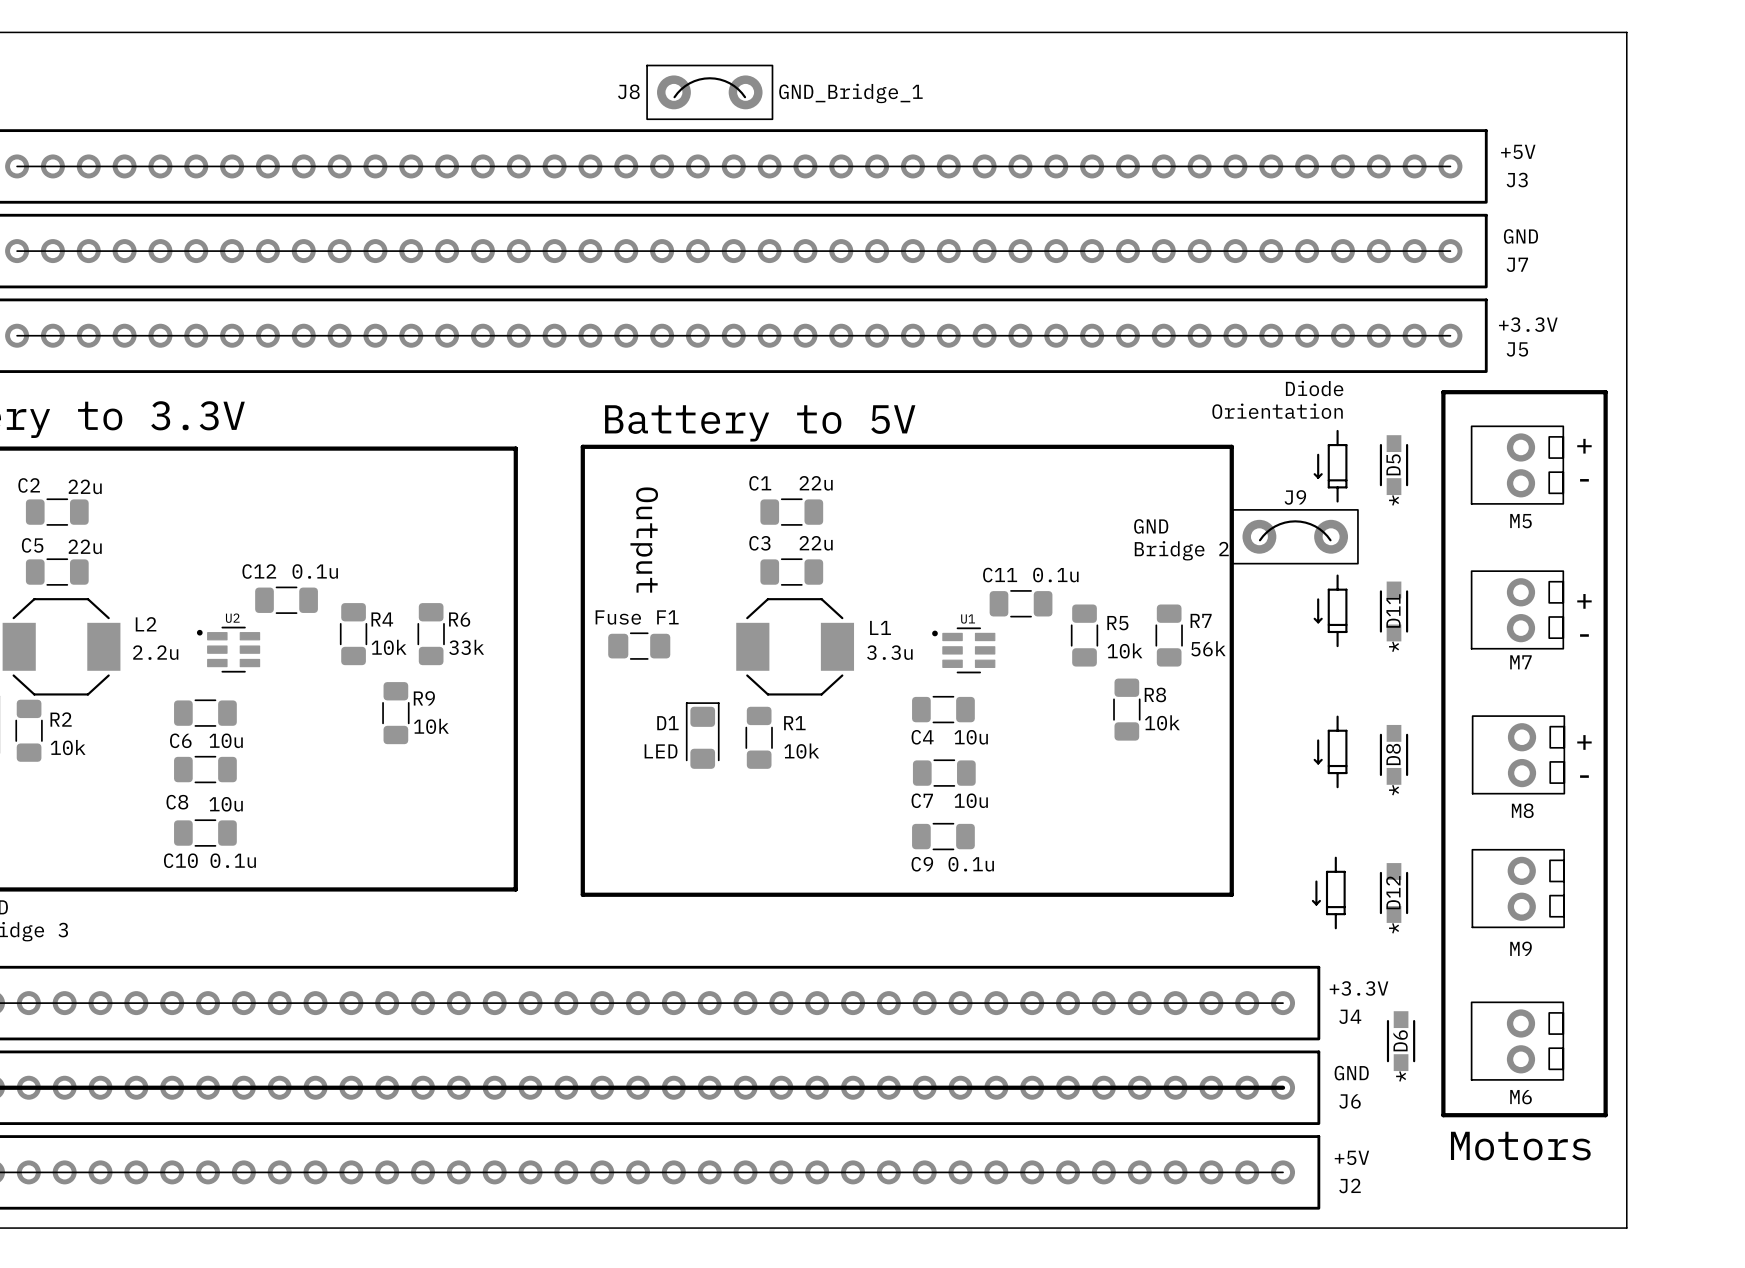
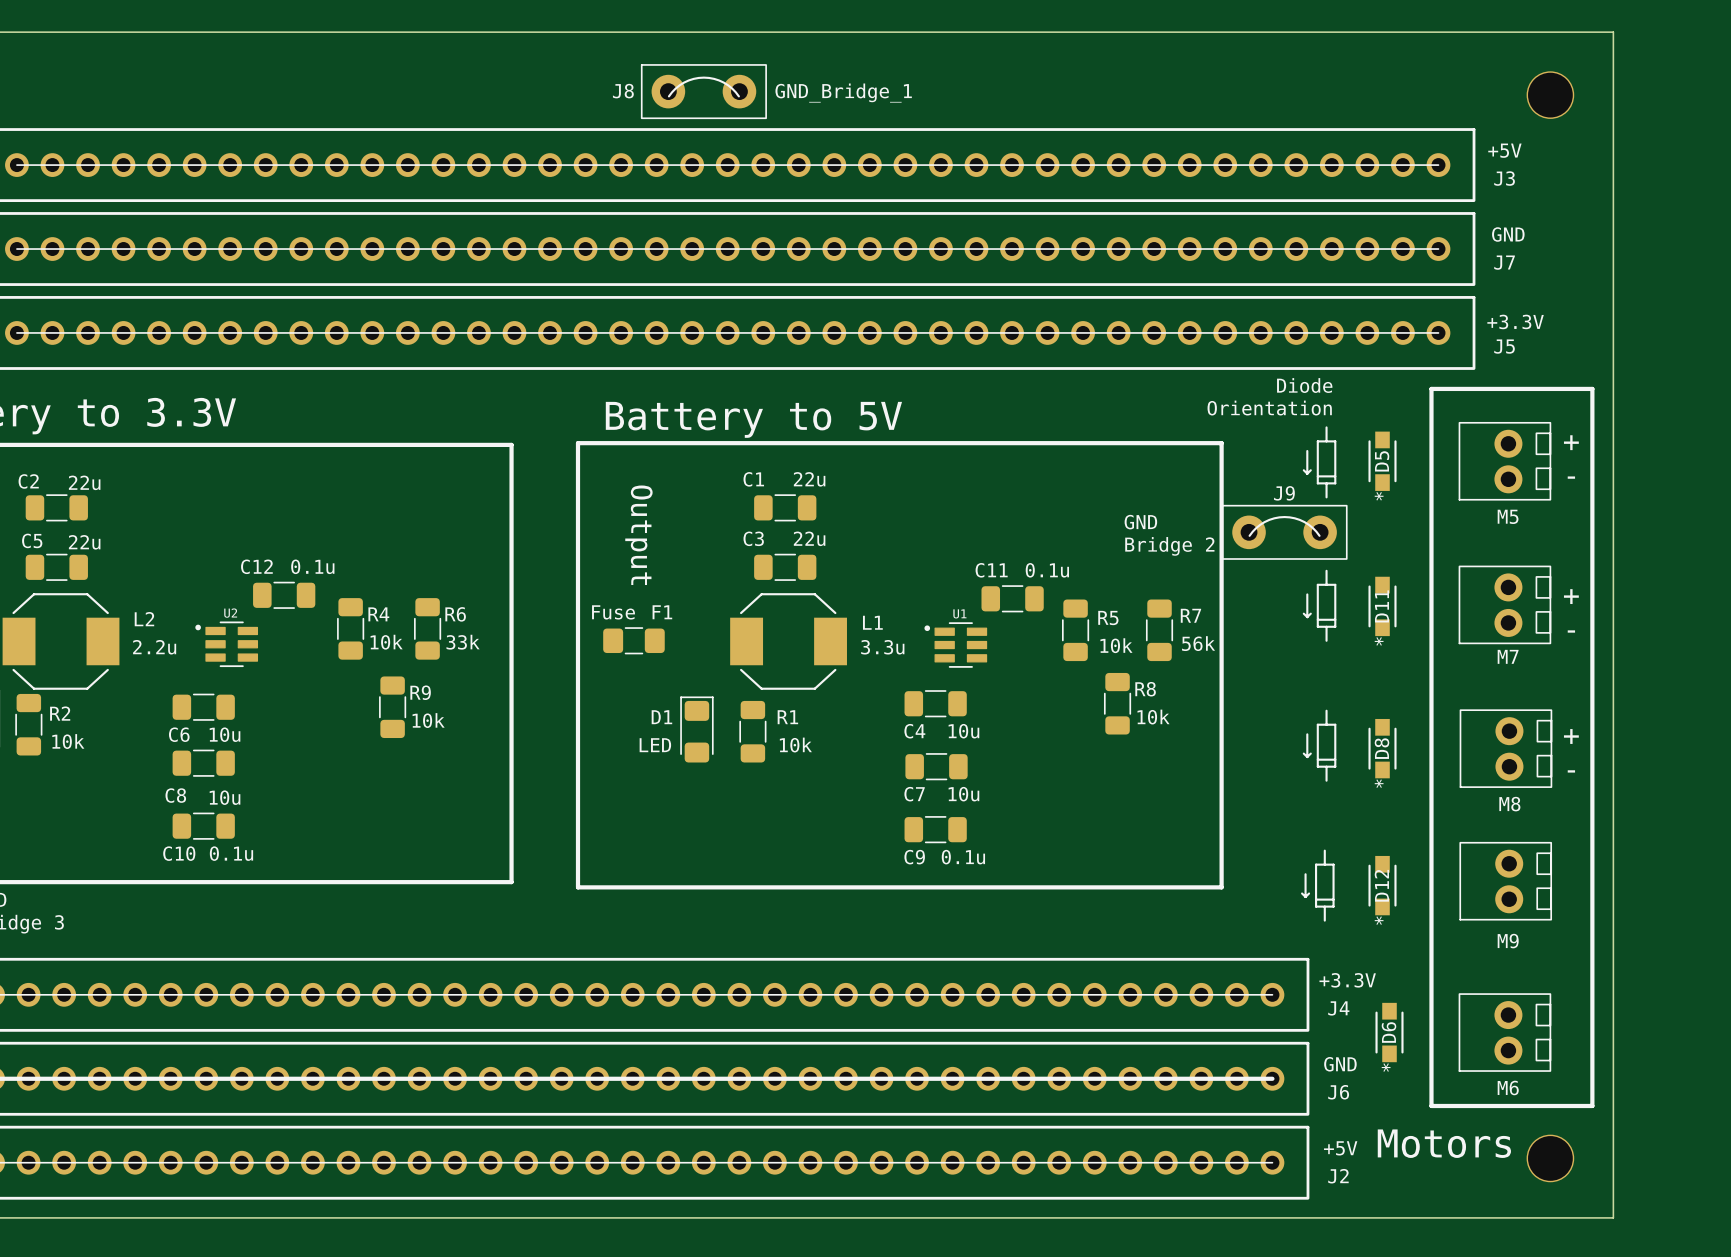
part: none -> (1550, 95)
text position: Motors (1520, 1146) -> Motors (1444, 1143)
part: none -> (1550, 1158)

